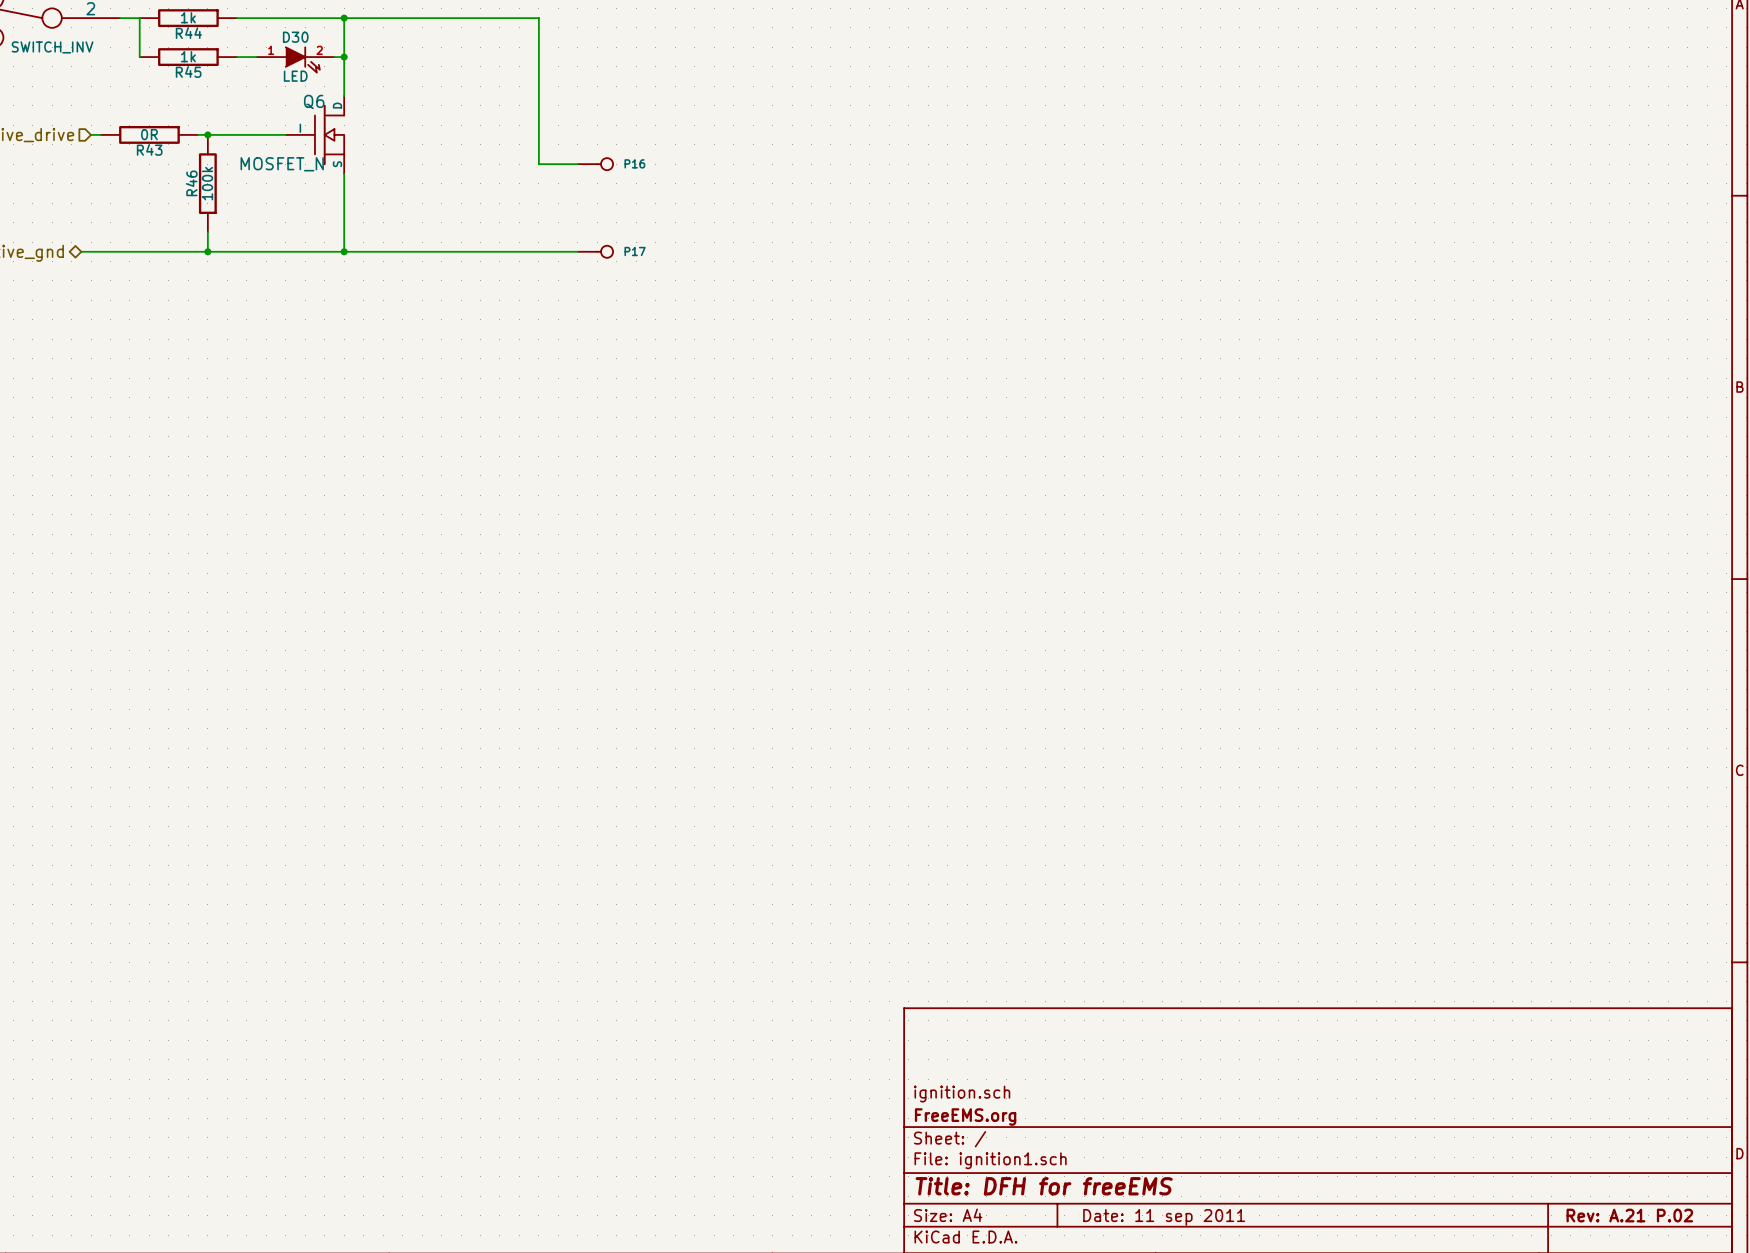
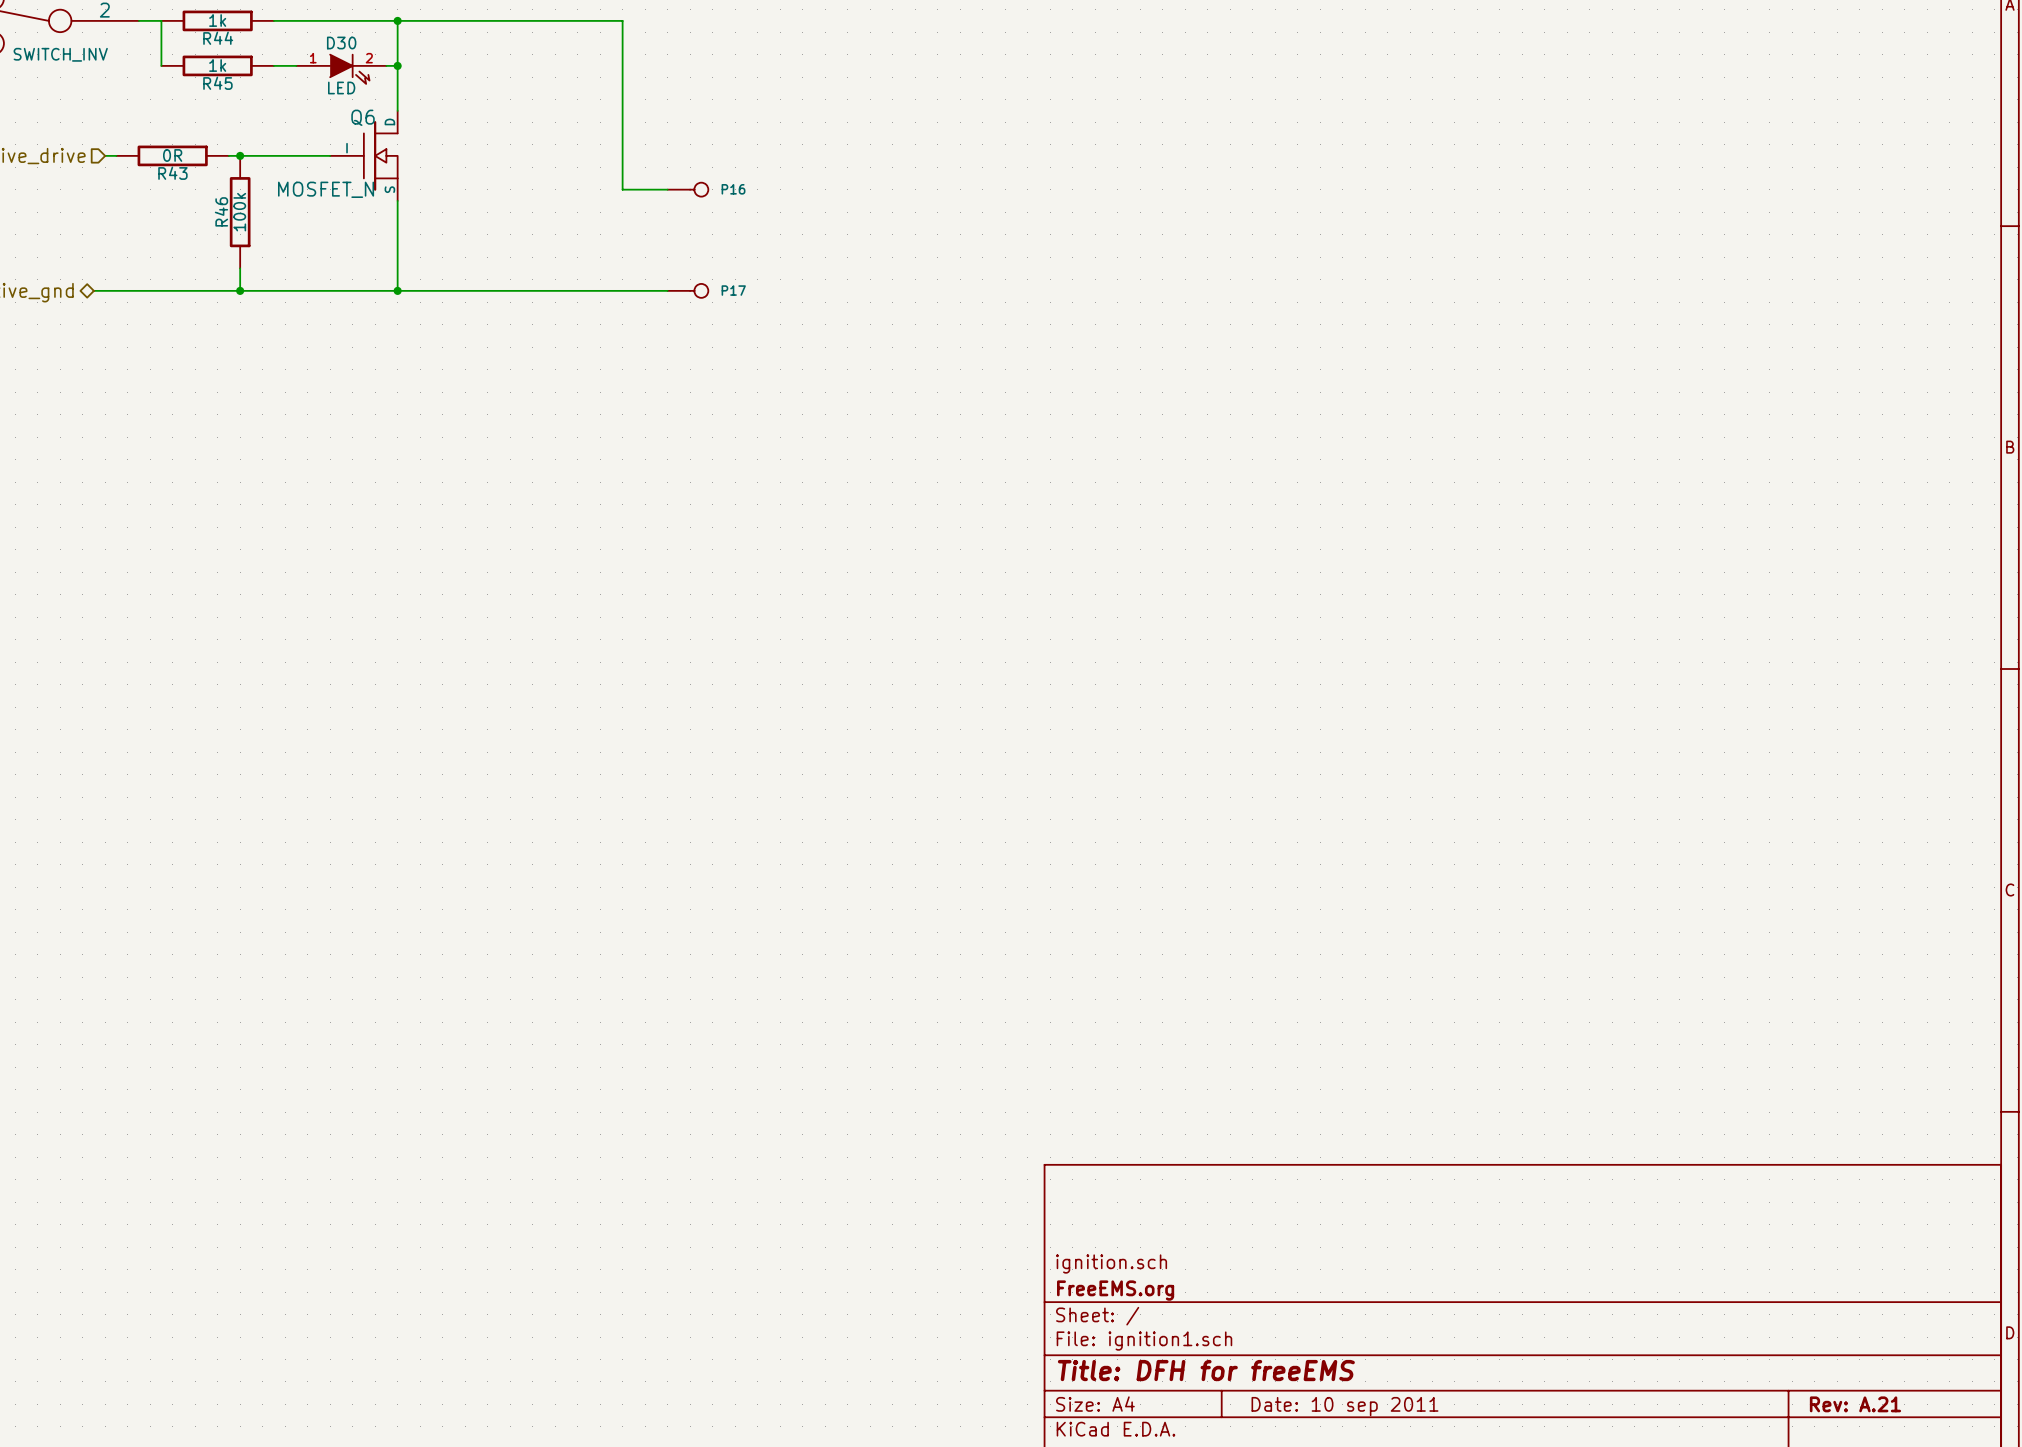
title block: Rev: A.21 P.02 (1629, 1215) -> Rev: A.21 (1855, 1404)
title block: Date: 11 sep 2011 (1164, 1217) -> Date: 10 sep 2011 (1345, 1406)

